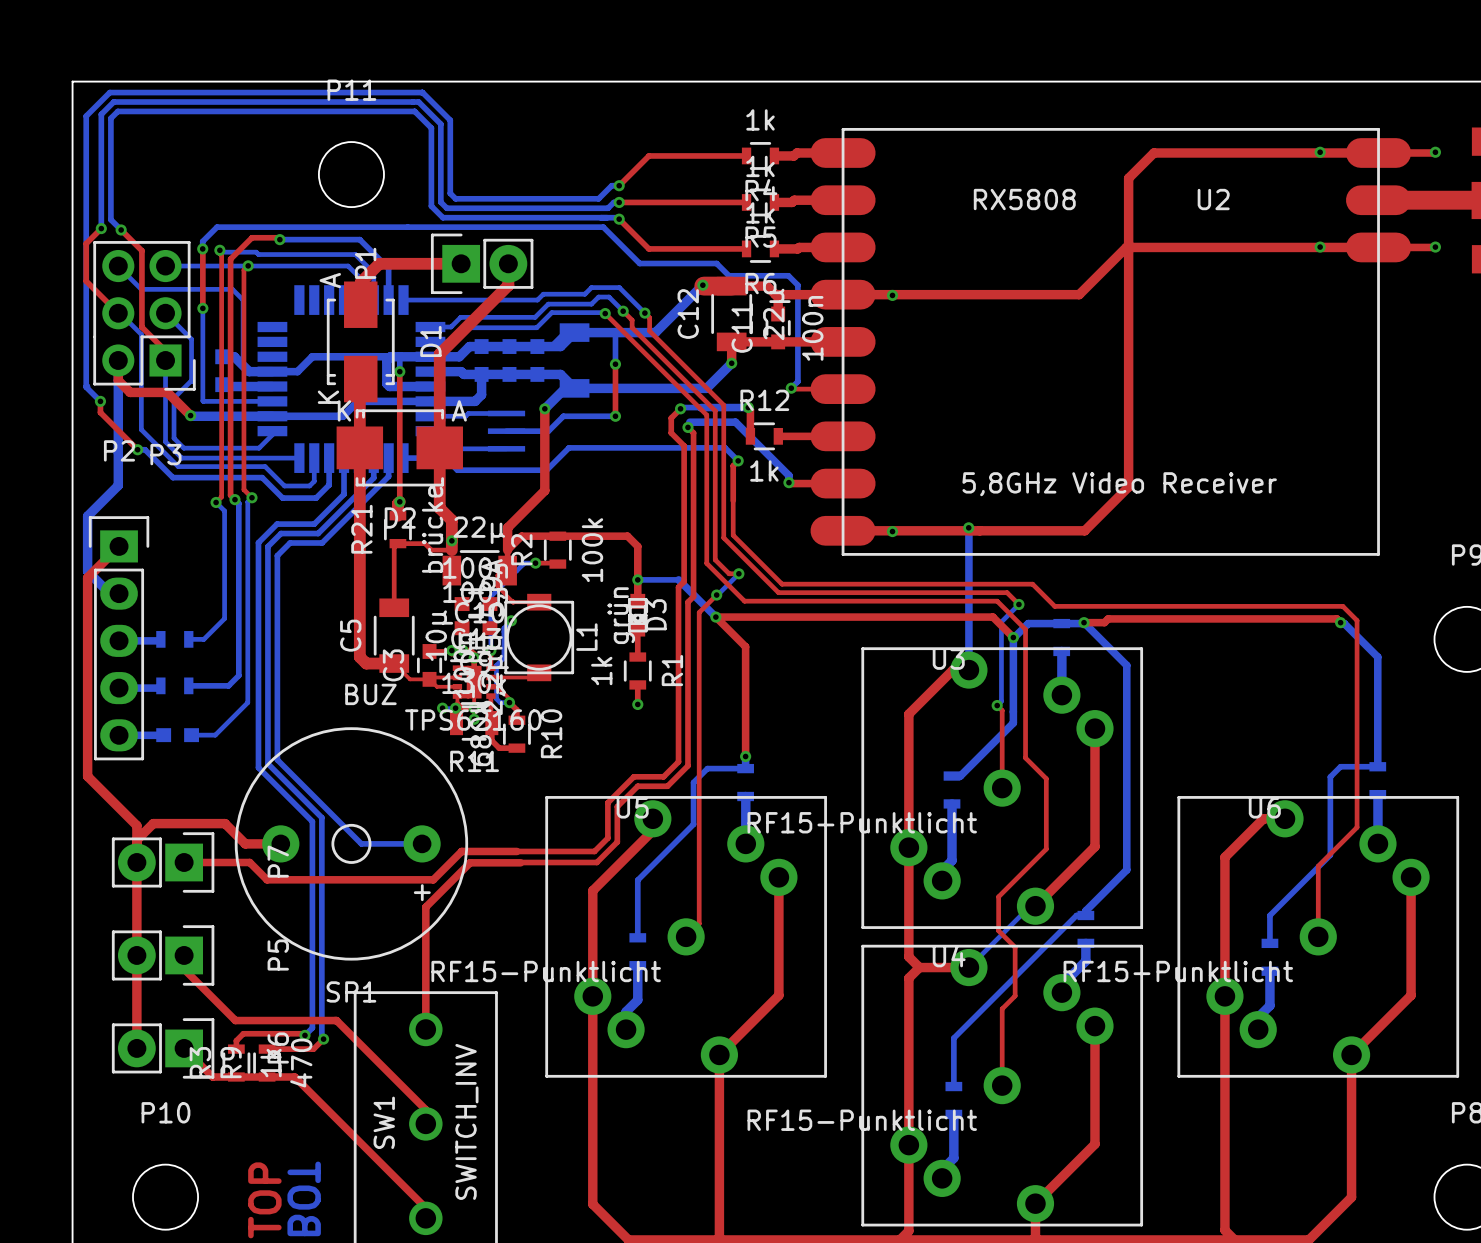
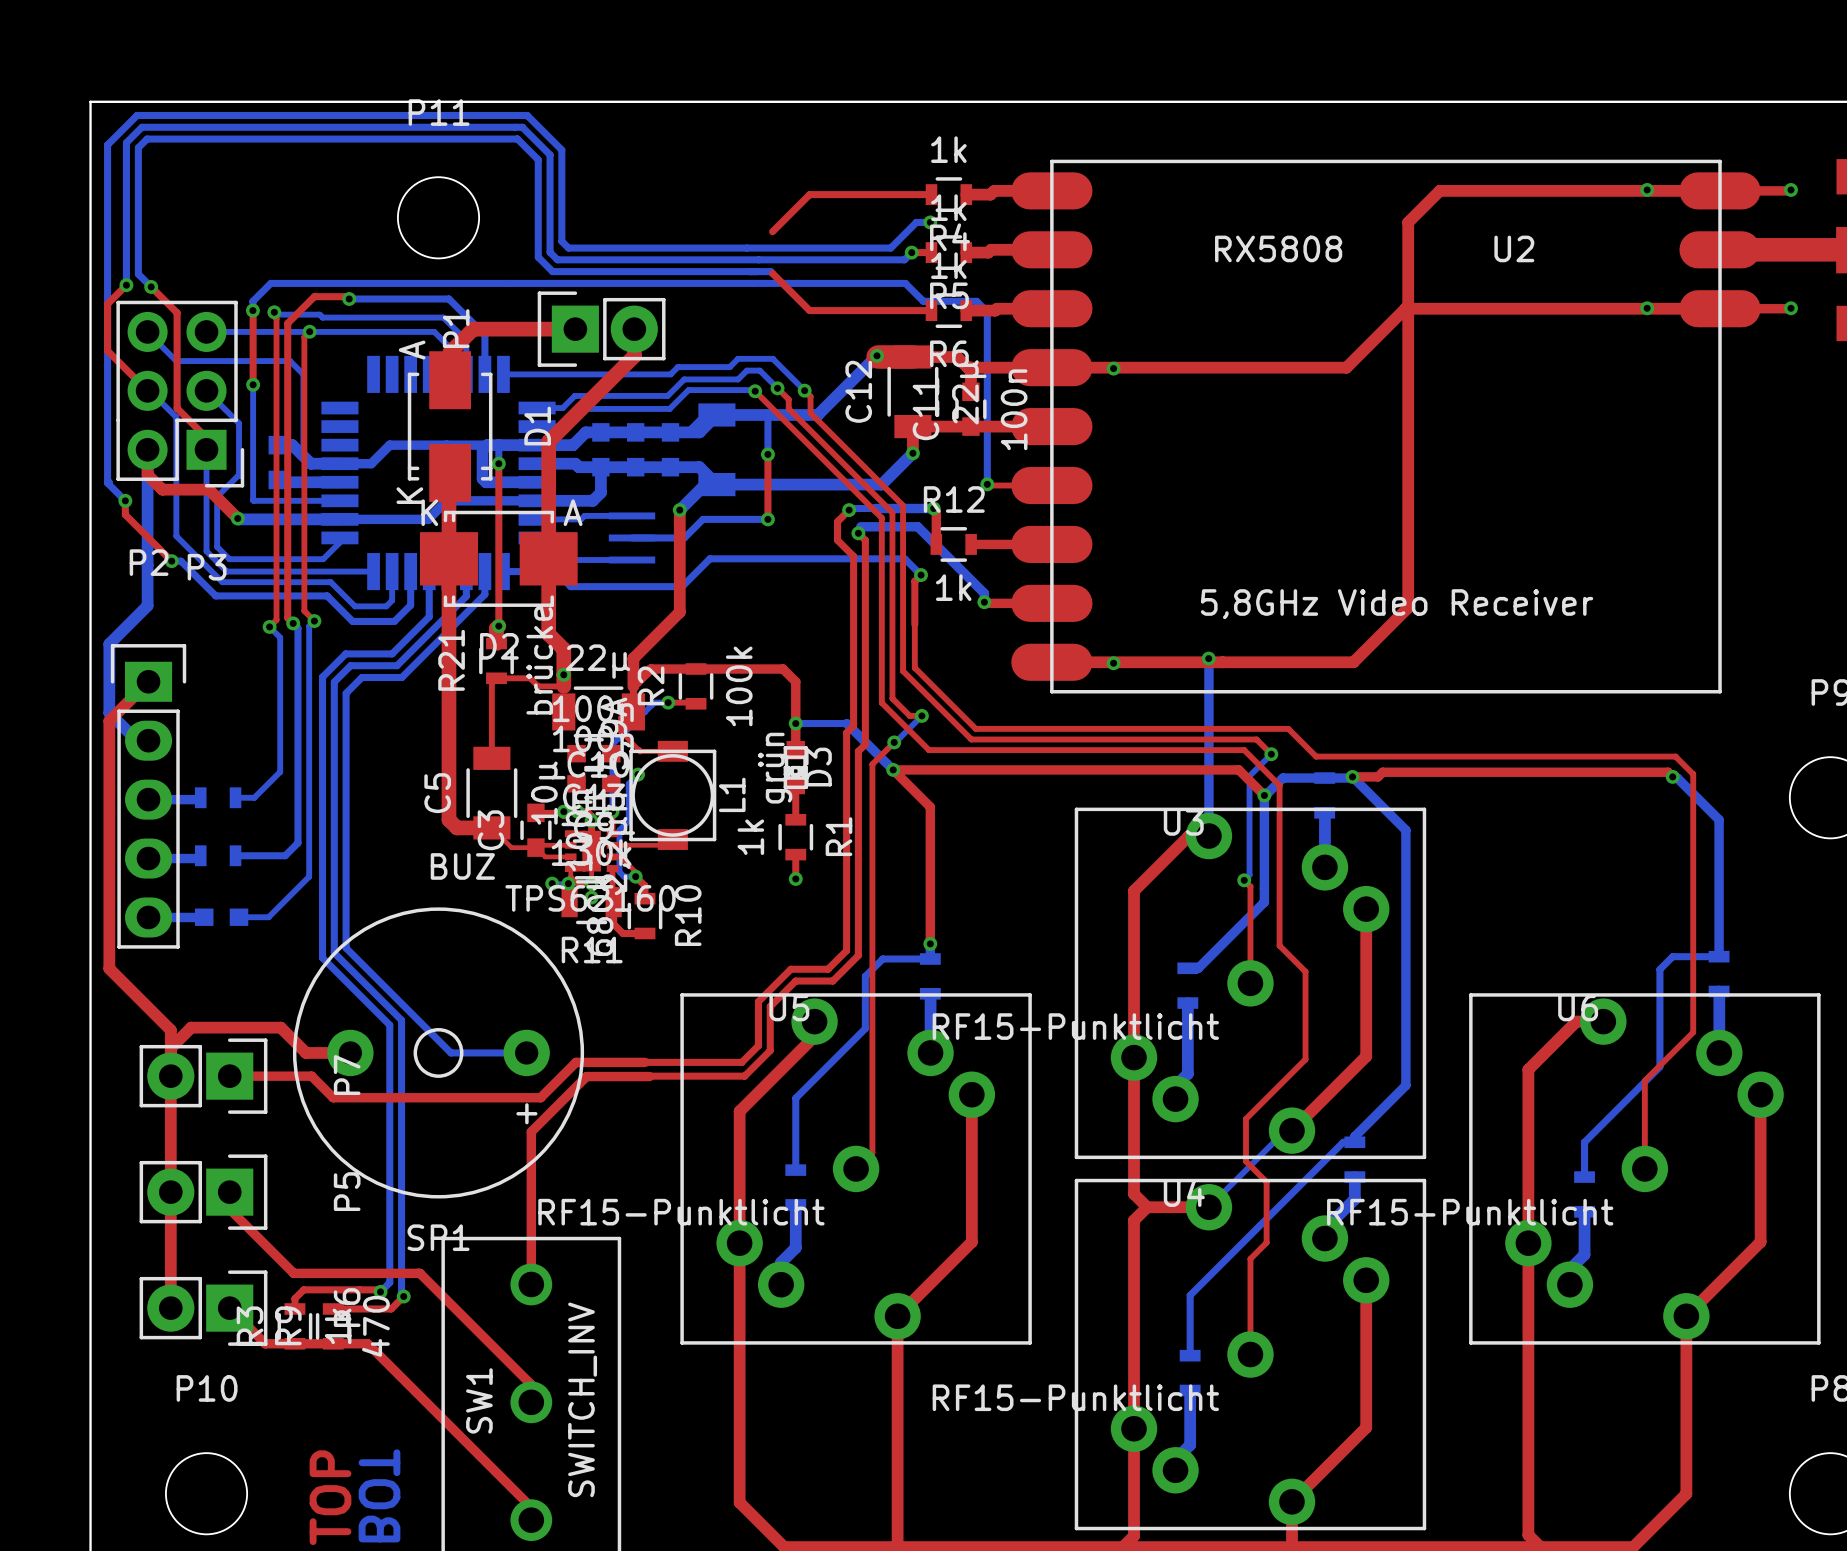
via: none -> (930, 222)
bottom track: (619, 185) (611, 185) (598, 198) -> (930, 222) (916, 222) (890, 248) (746, 248)
via: (619, 185) -> none
bottom track: (619, 202) (613, 202) (608, 208) -> (911, 252) (904, 259) (758, 259)
top track: (619, 202) (730, 202) -> none
via: (619, 202) -> none
via: none -> (911, 252)
via: (619, 219) -> none
bottom track: (603, 227) (639, 263) (716, 263) (728, 275) (788, 275) (797, 285) (797, 381) (791, 388) -> (752, 283) (905, 283) (923, 301) (976, 301) (987, 311) (987, 484)

